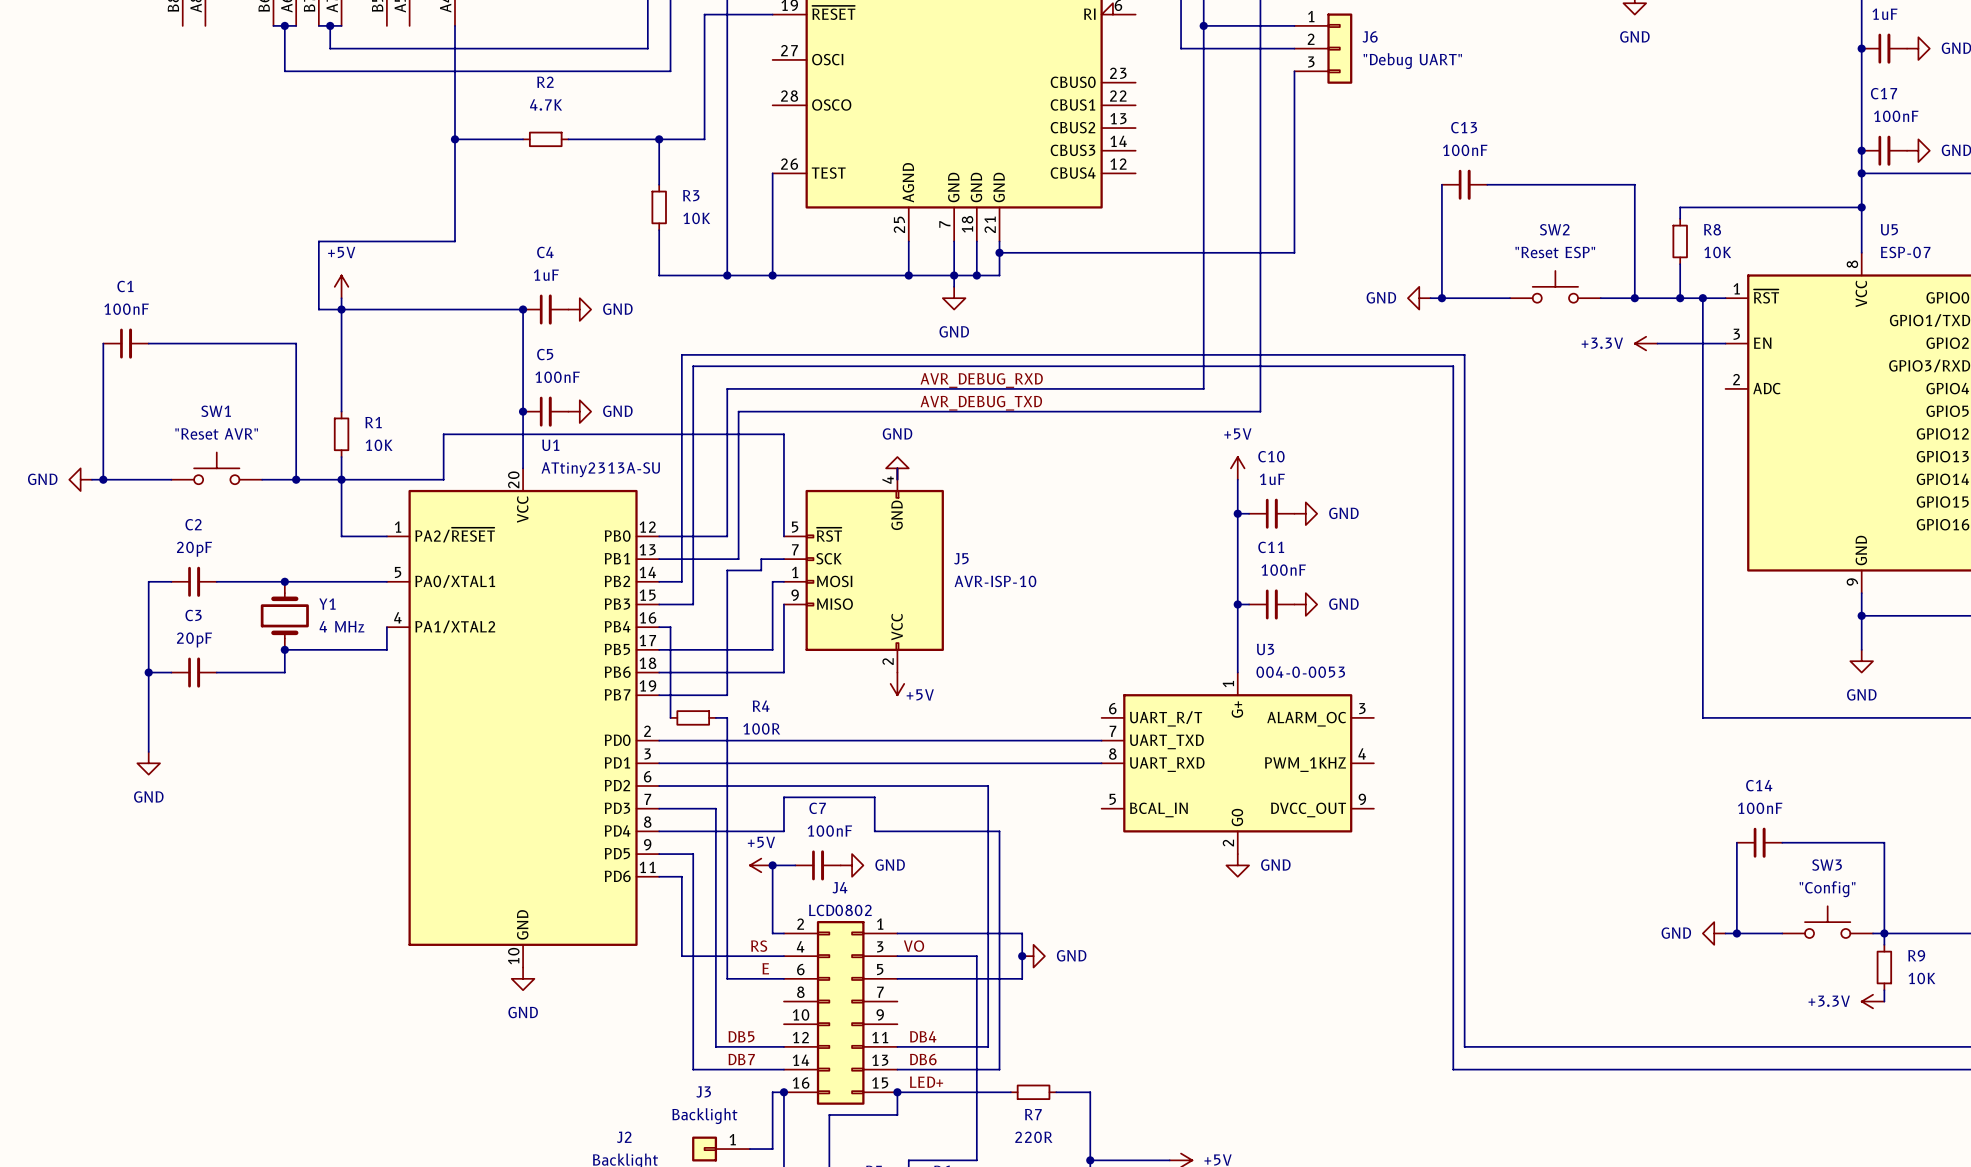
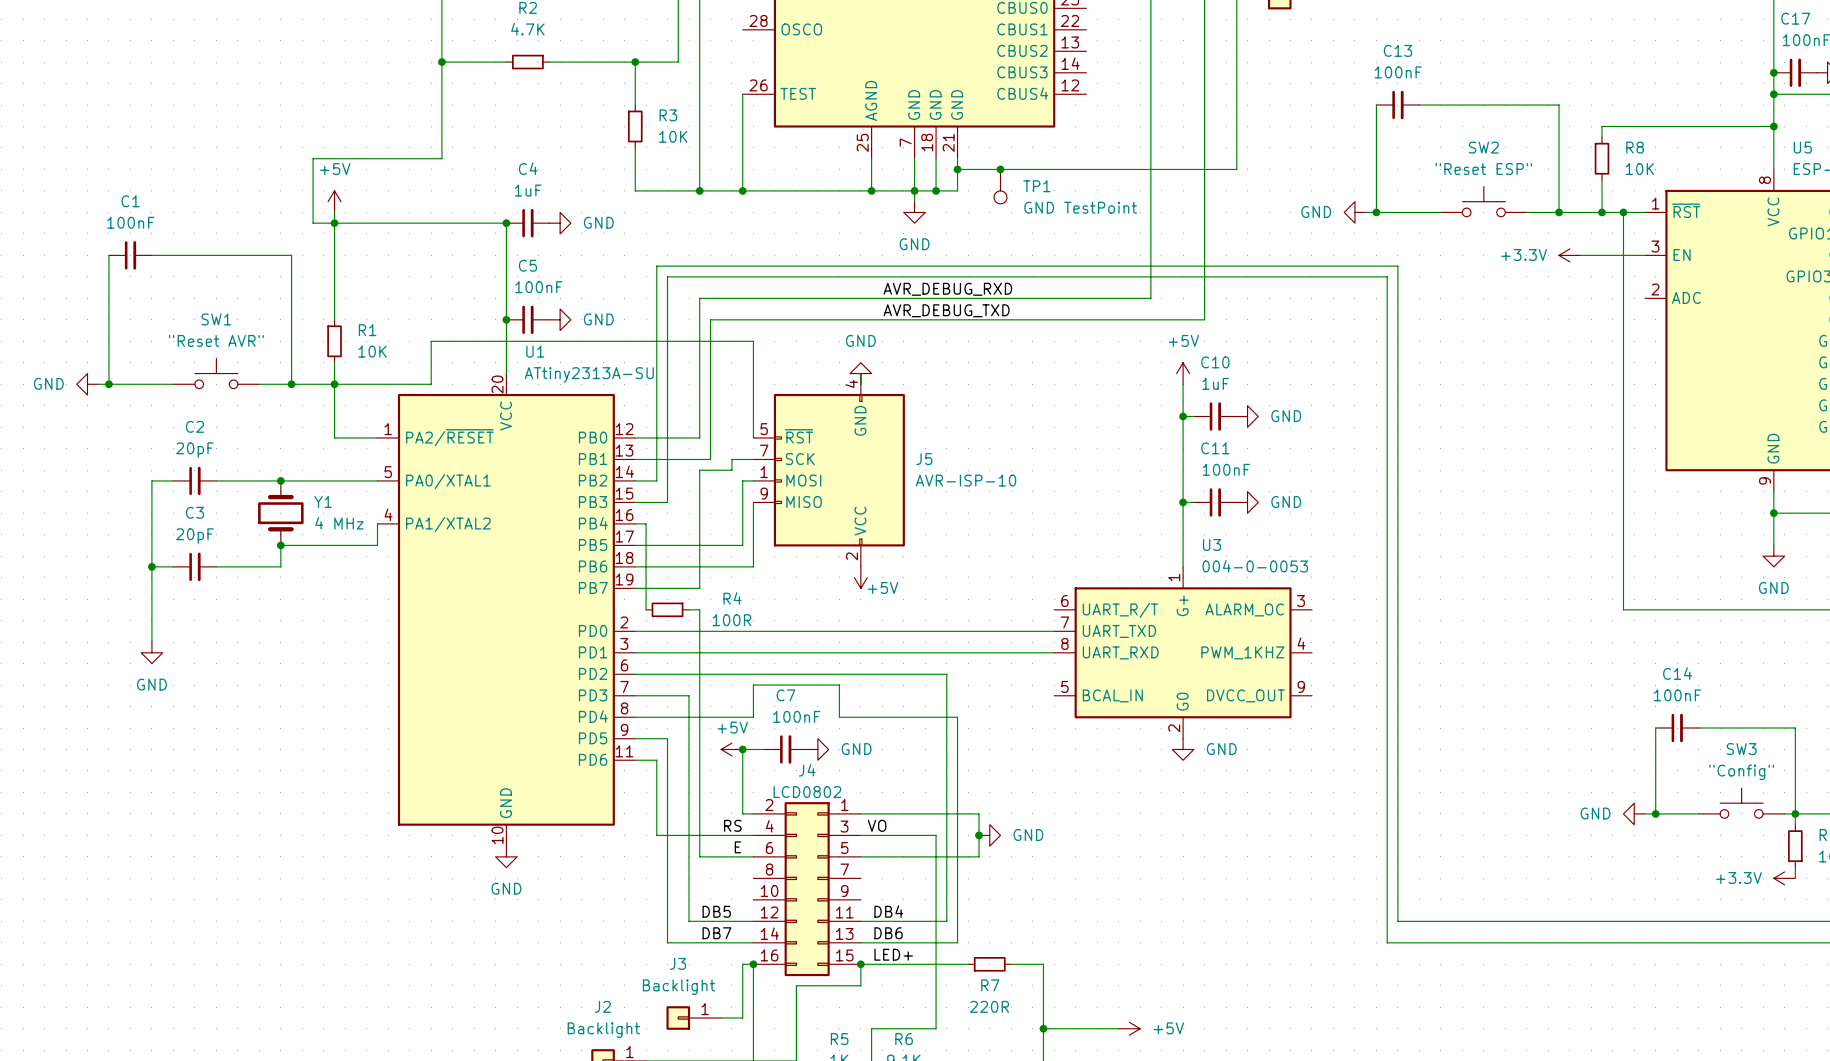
junction: none -> (1000, 169)
TP1: none -> GND TestPoint (1000, 186)

